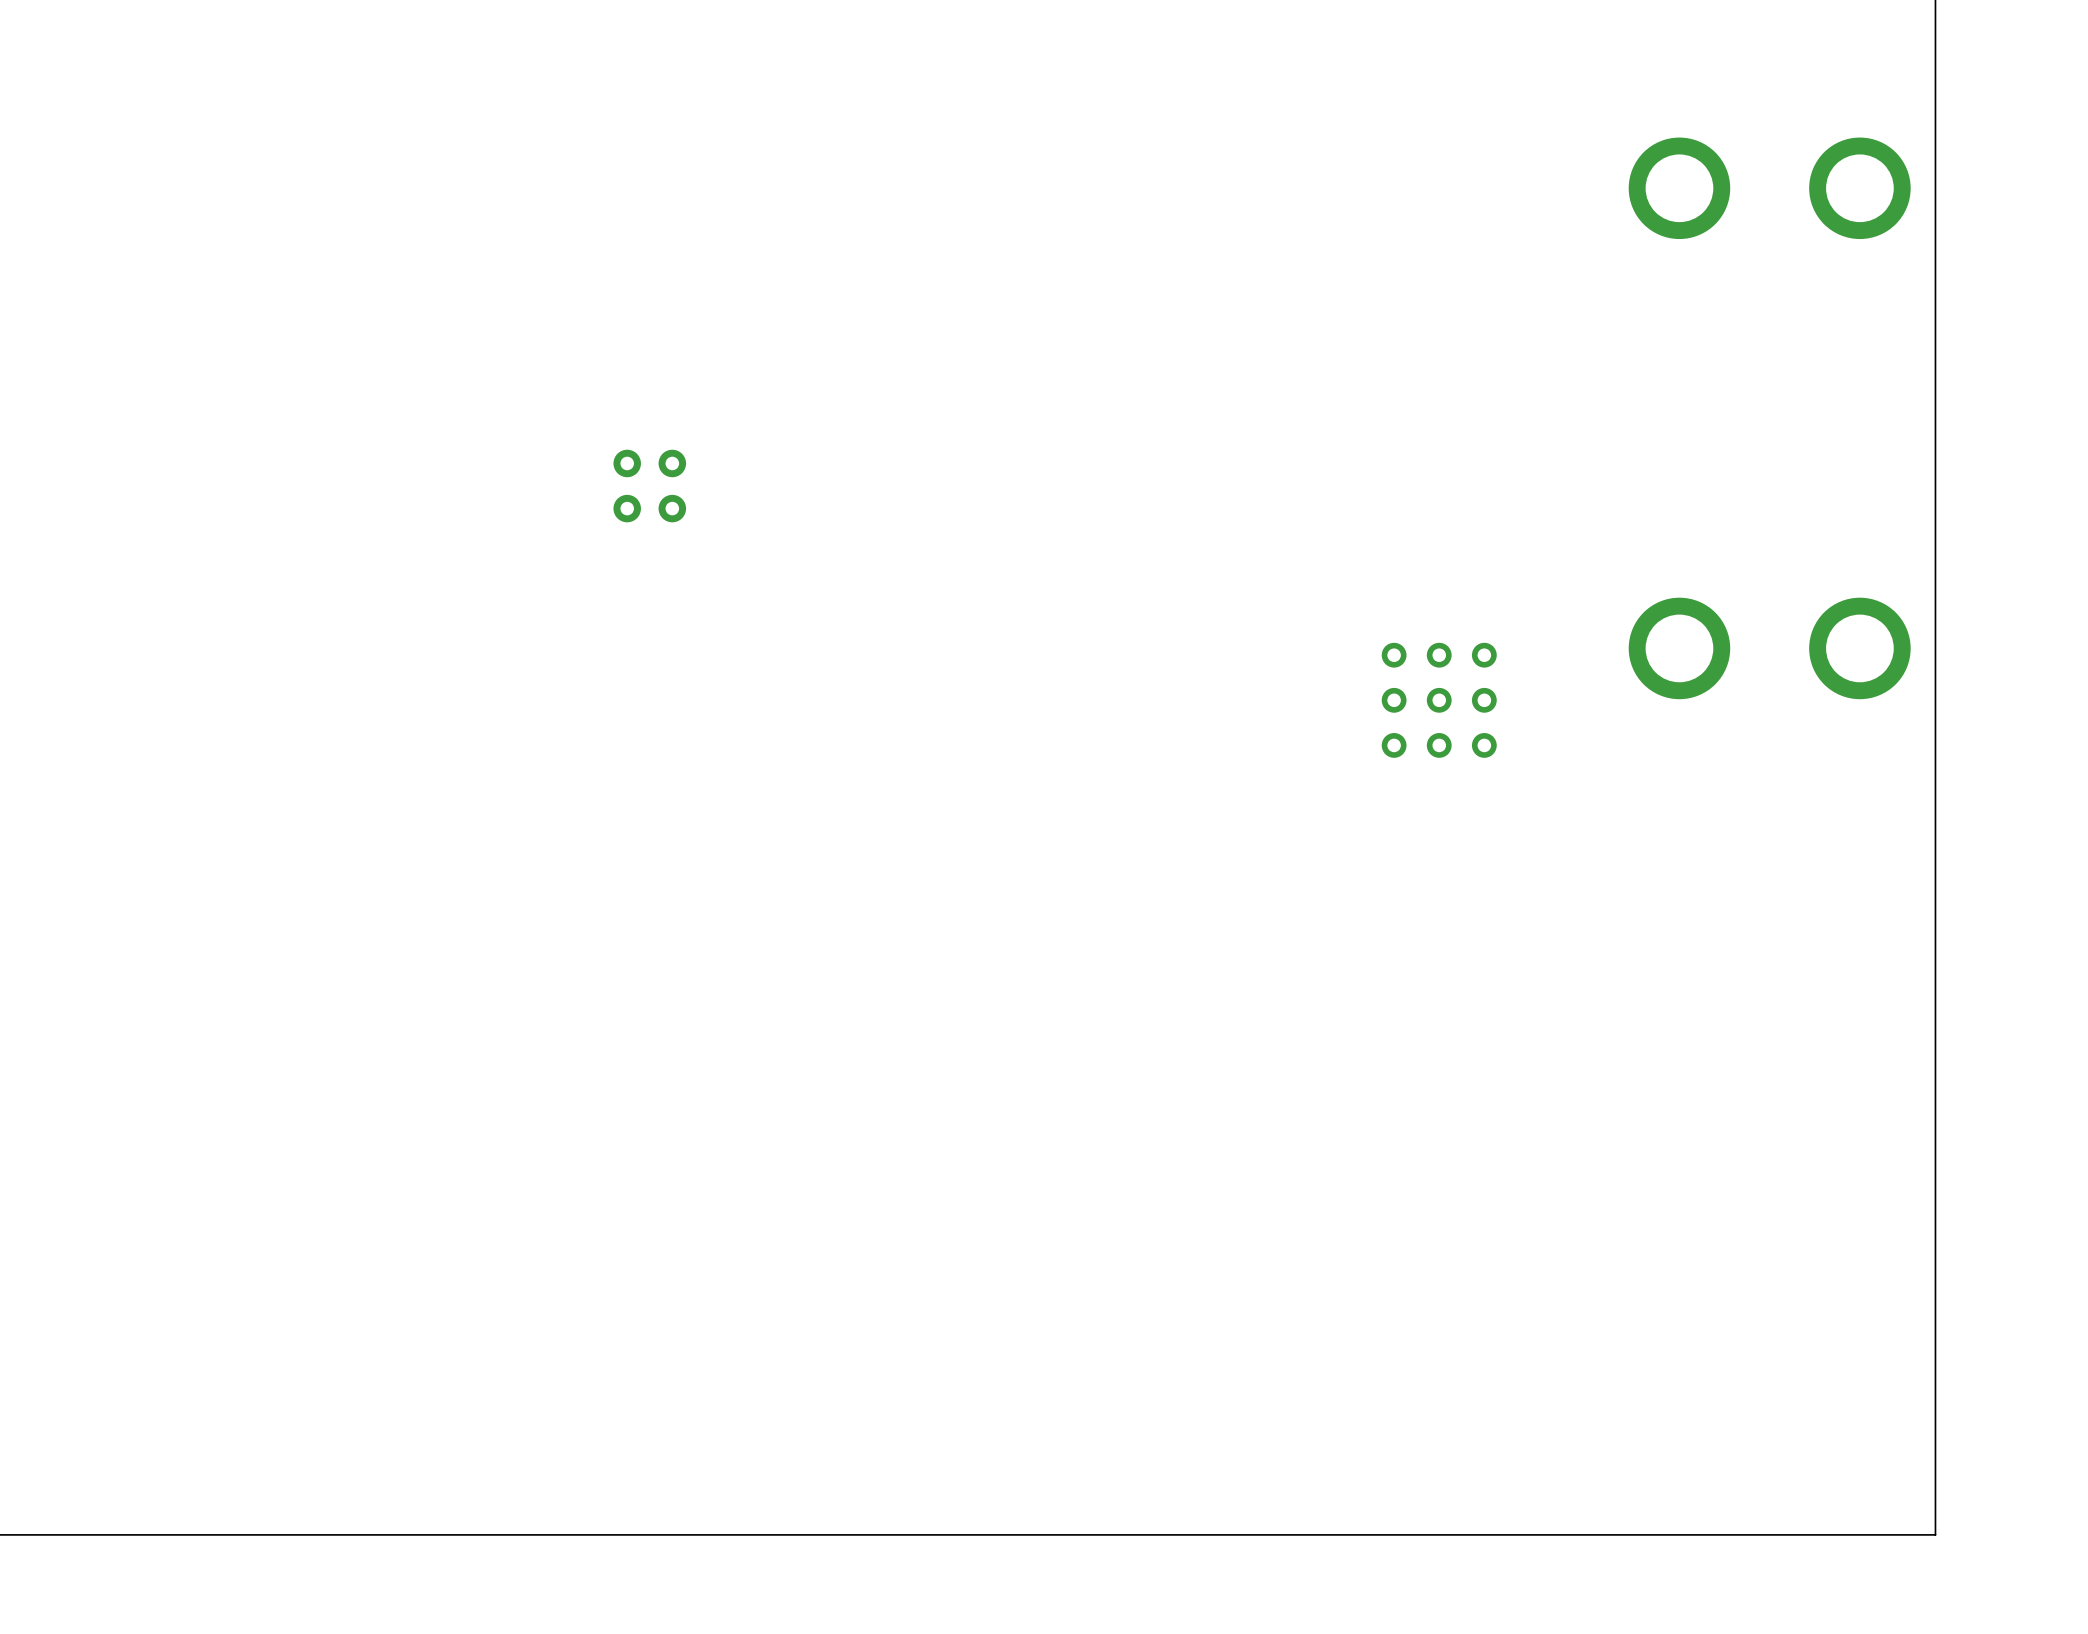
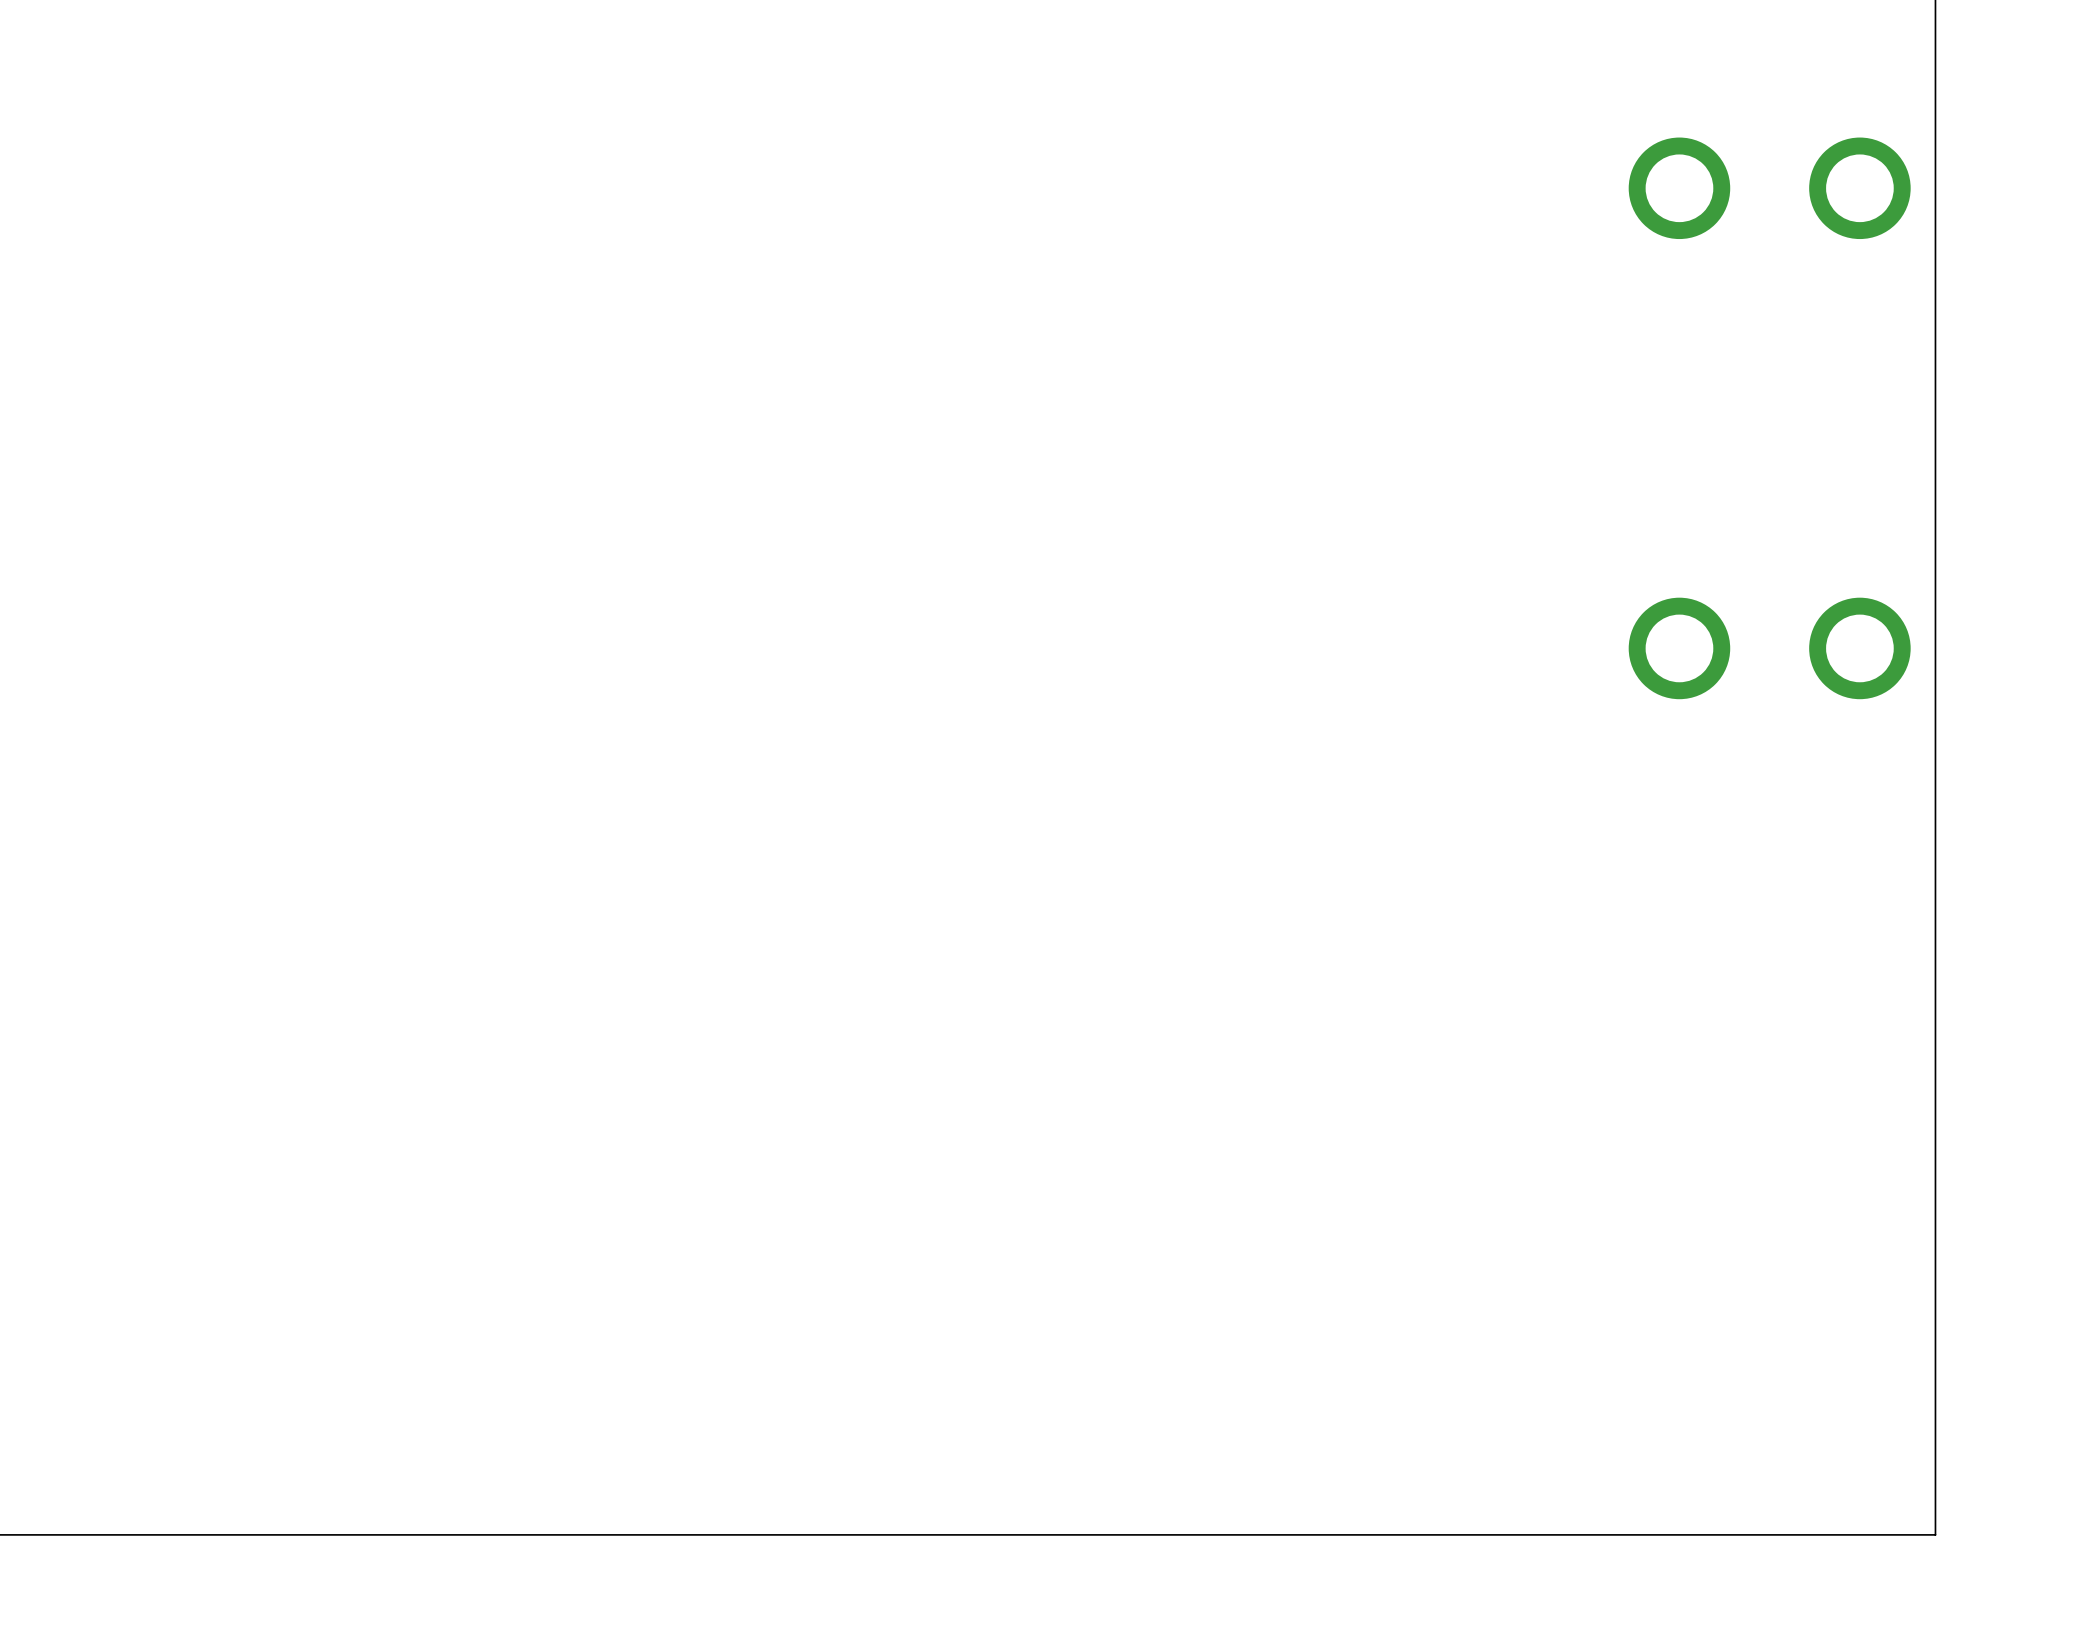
part: (649, 486) -> none
part: (1439, 700) -> none

